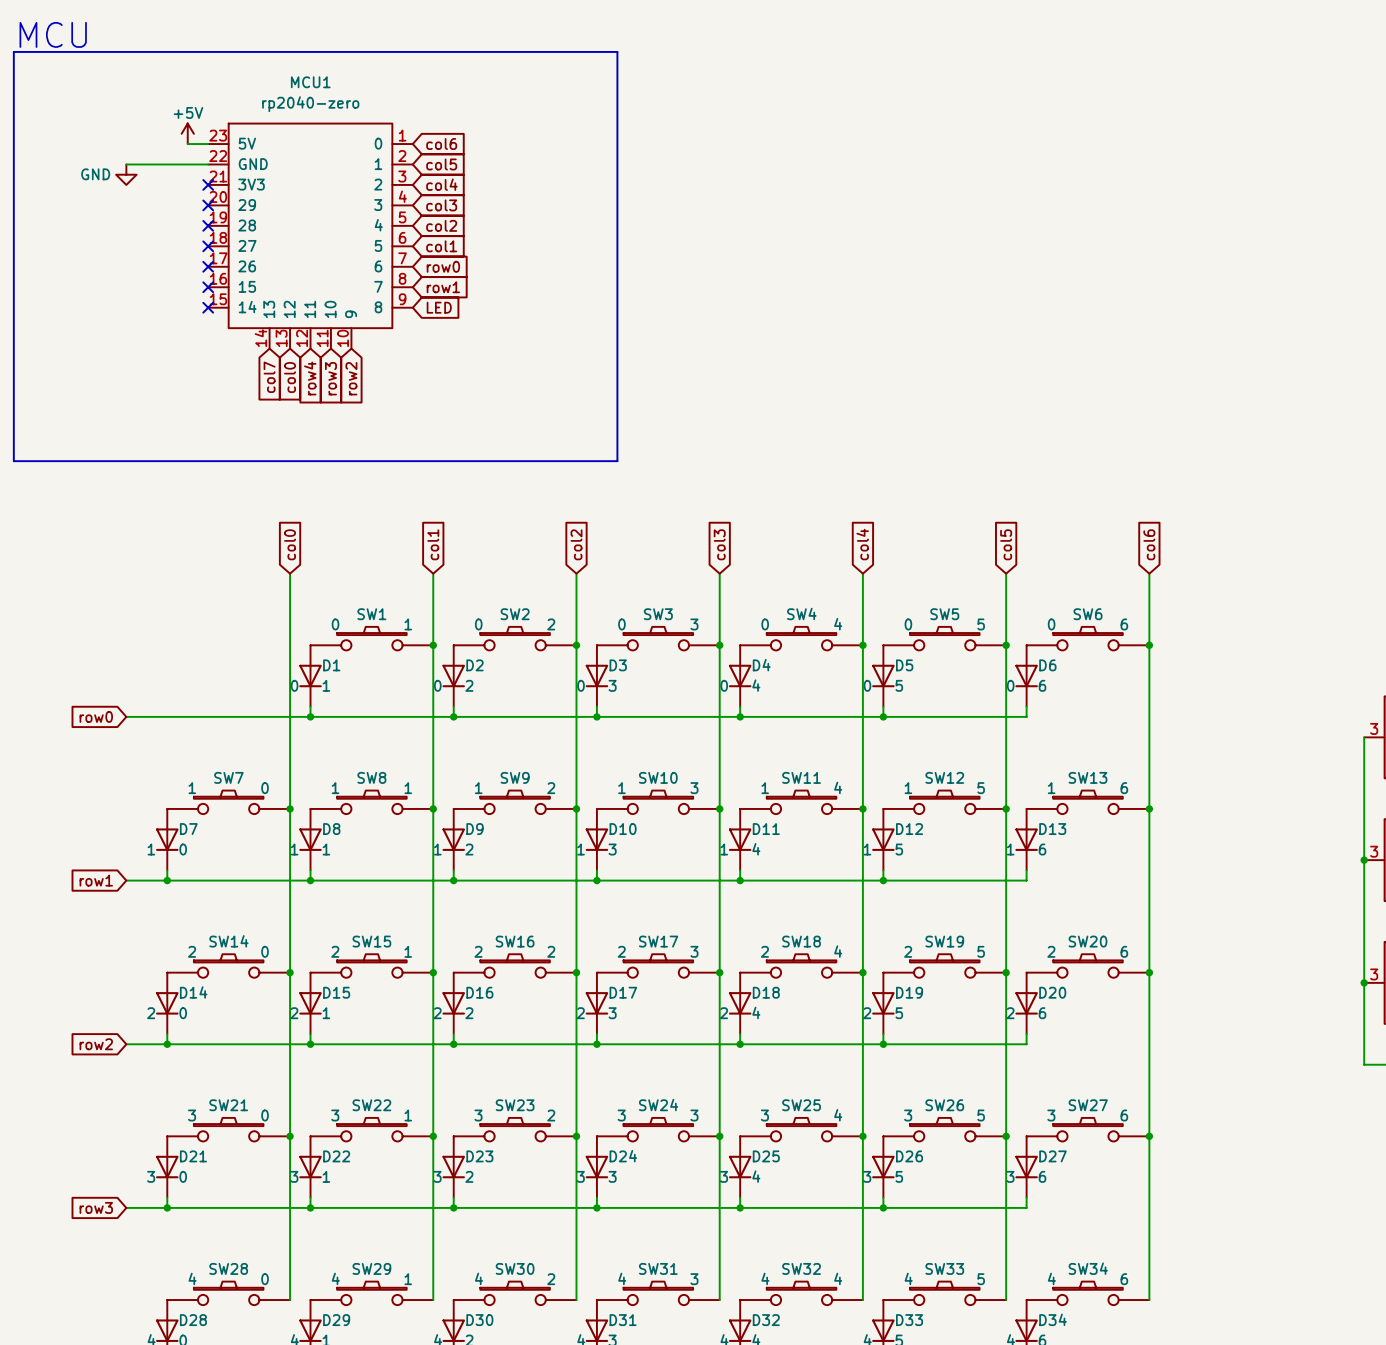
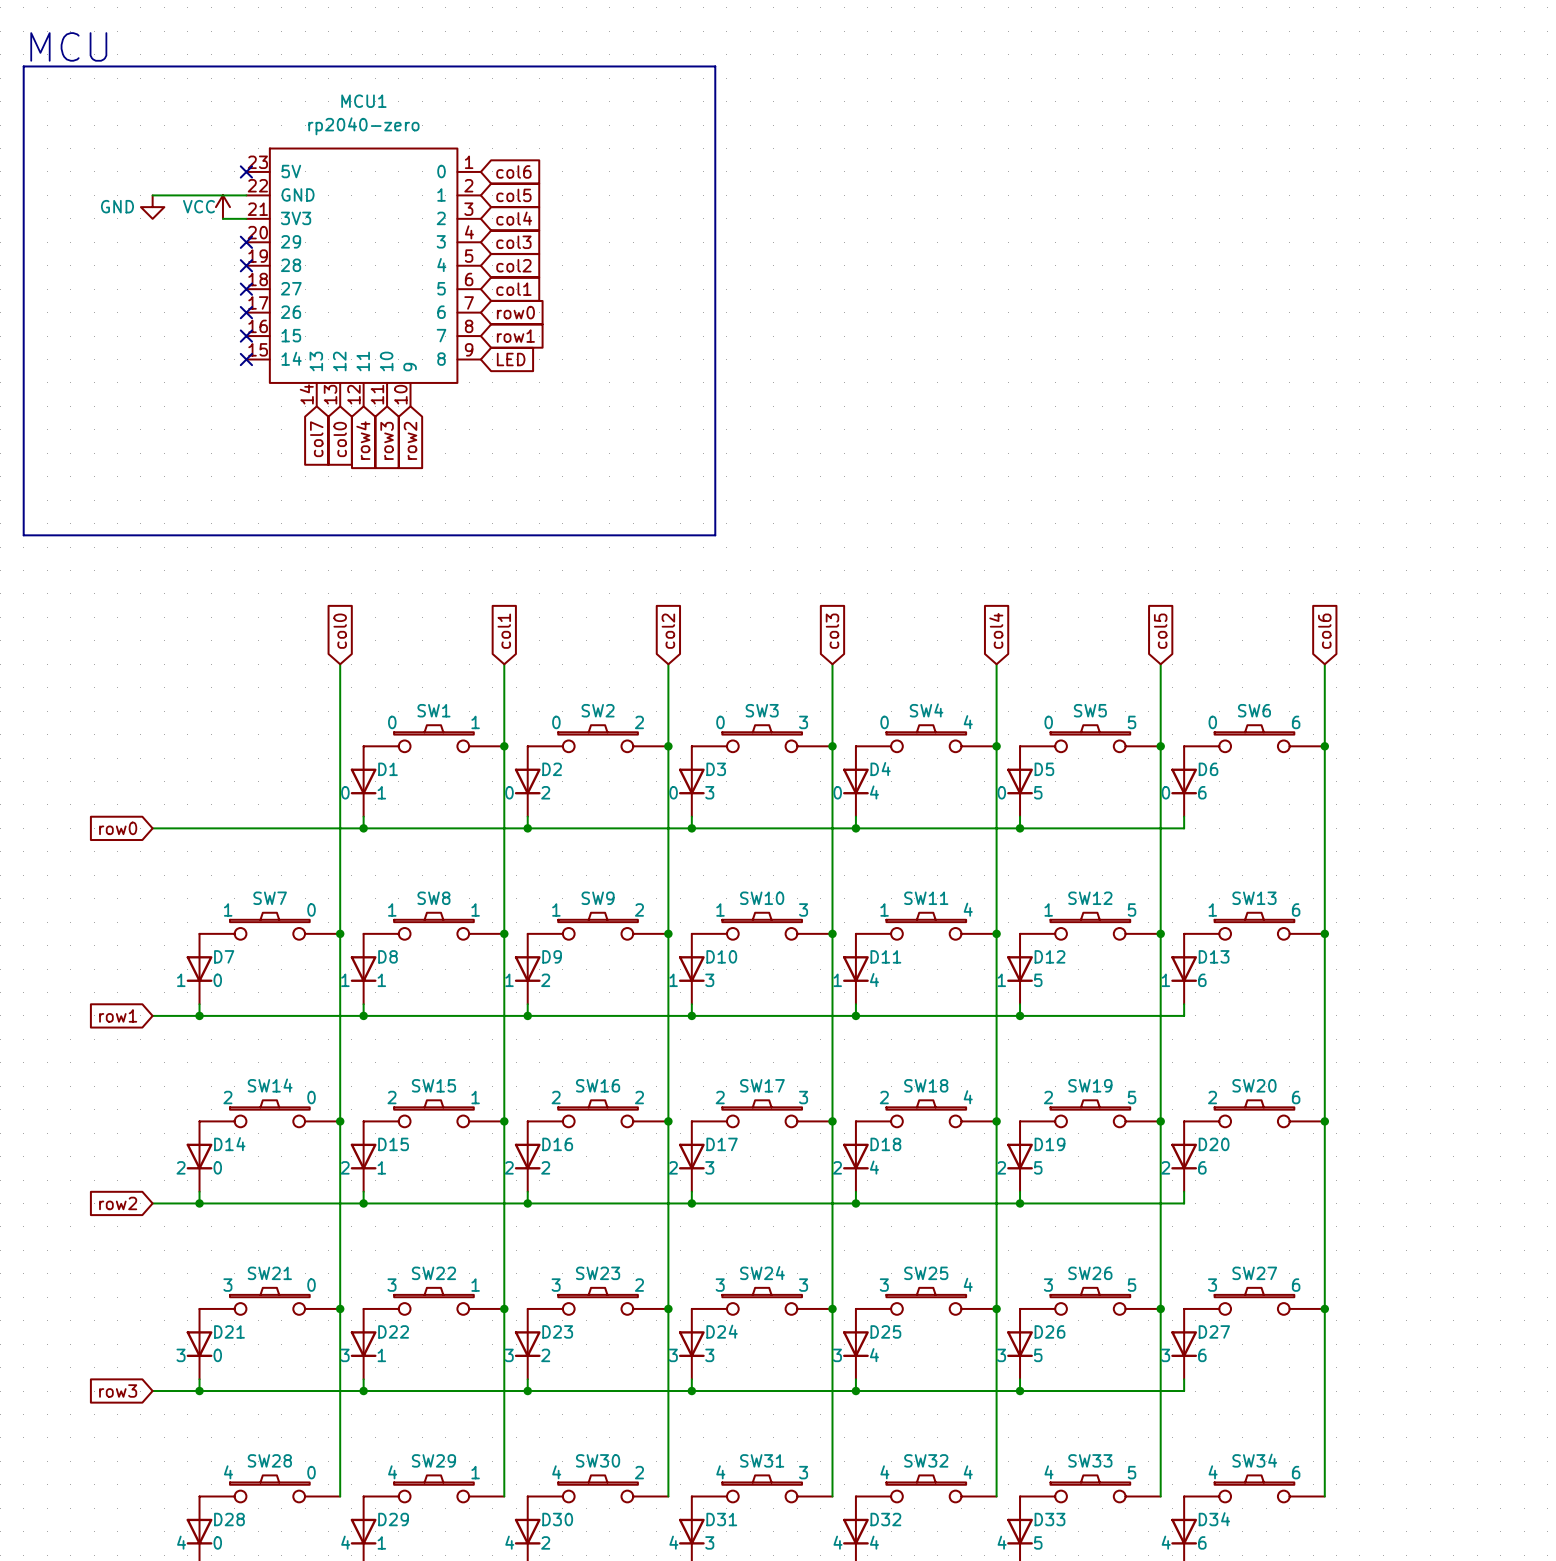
power symbol: +5V (187, 133) -> none
wire: (187, 144) (208, 144) -> (222, 218) (246, 218)
power symbol: none -> VCC (222, 207)
no-connect mark position: (208, 184) -> (246, 171)

